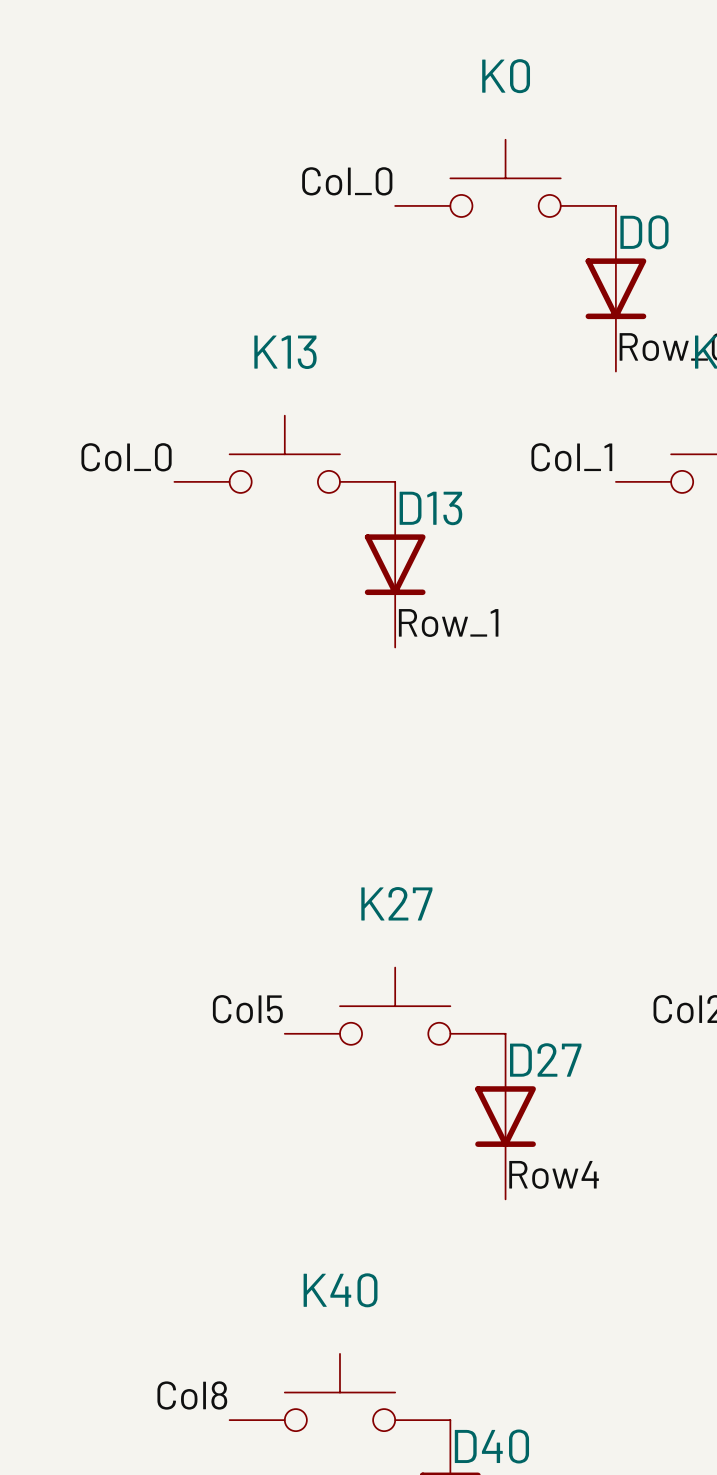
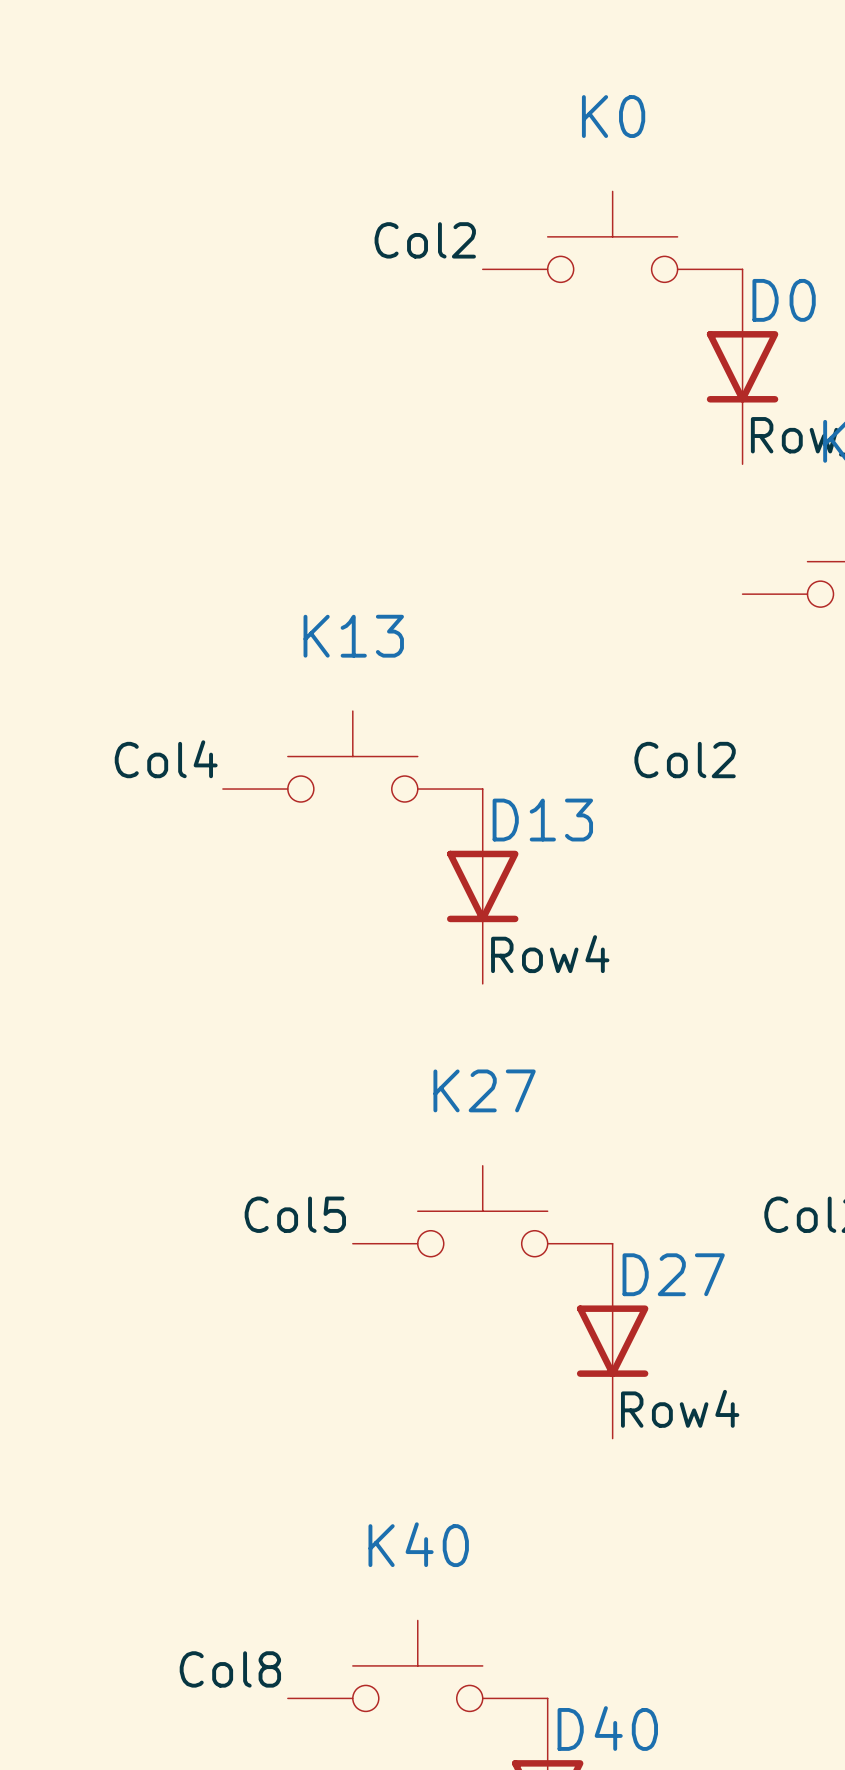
label: Col_0 (347, 181) -> Col2 (425, 240)
K13 position: (284, 454) -> (352, 756)
label: Col_0 (126, 457) -> none
label: Col_1 (571, 457) -> none
D13 position: (395, 564) -> (482, 886)
label: none -> Col4 (166, 759)
label: none -> Col2 (685, 760)
label: Row_1 (448, 623) -> none
label: none -> Row4 (550, 954)

